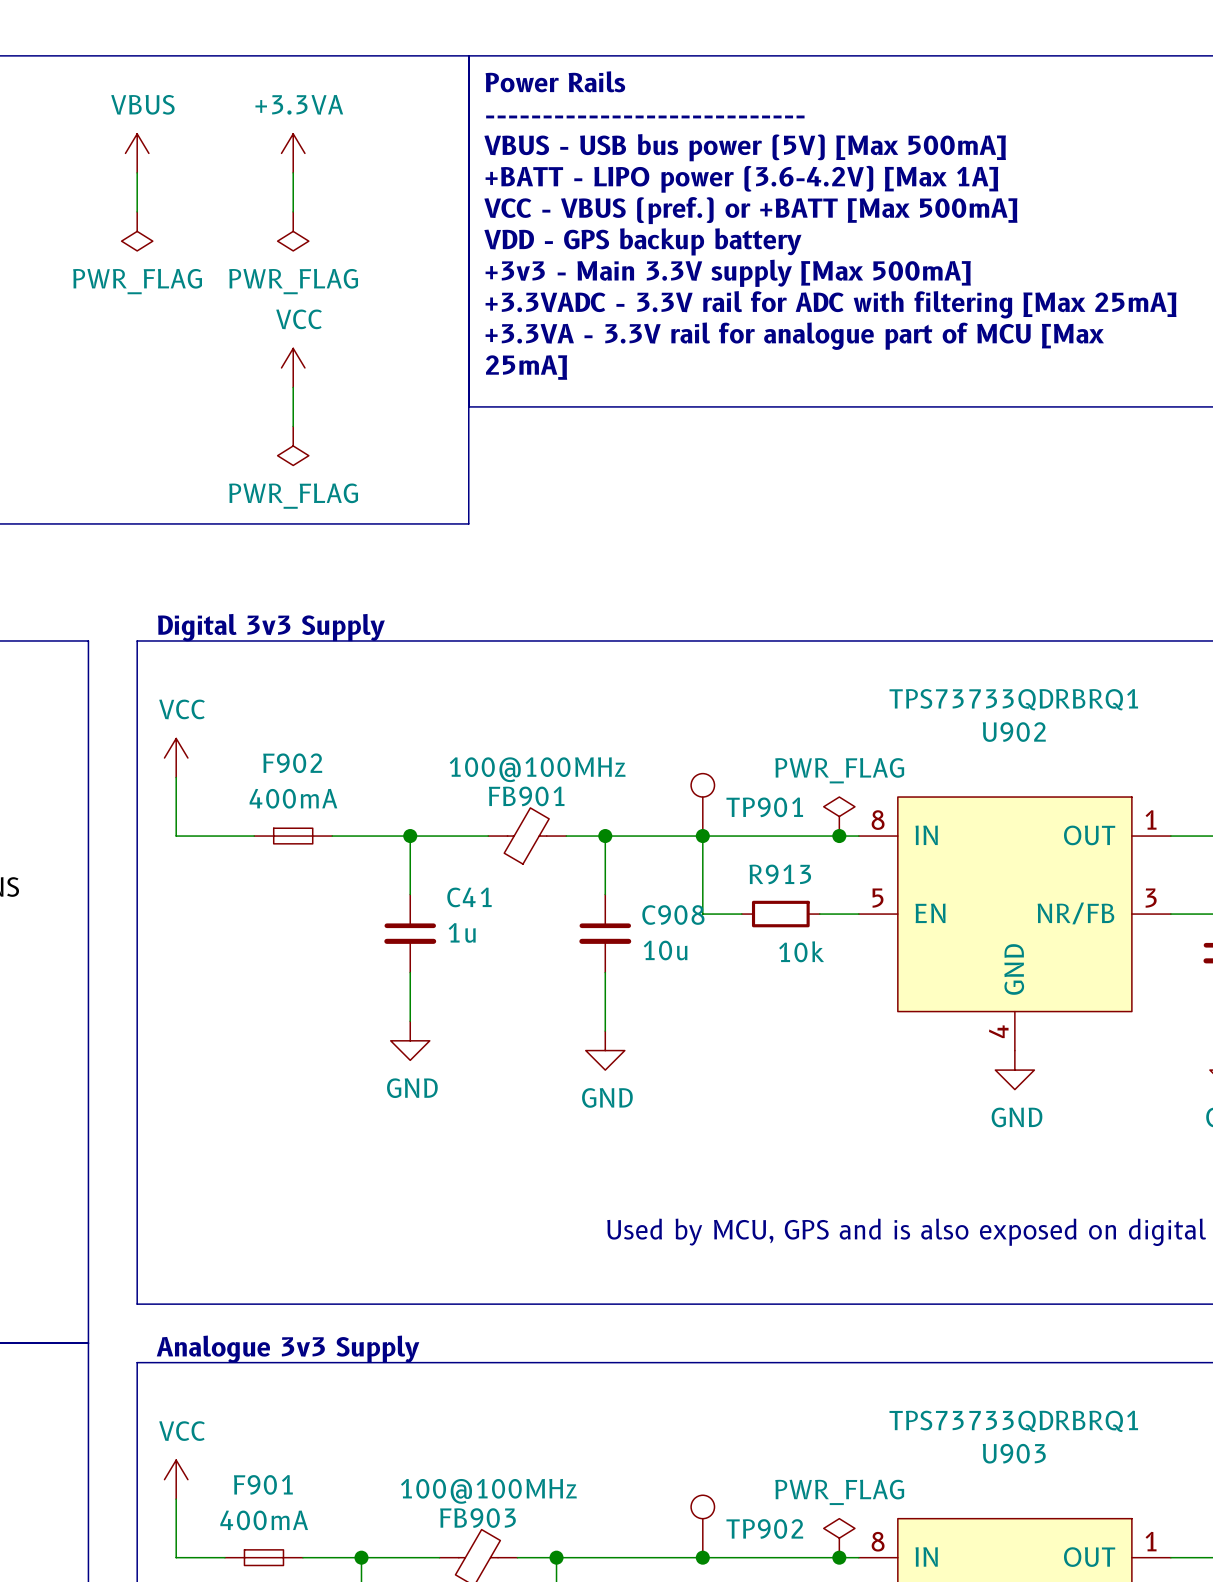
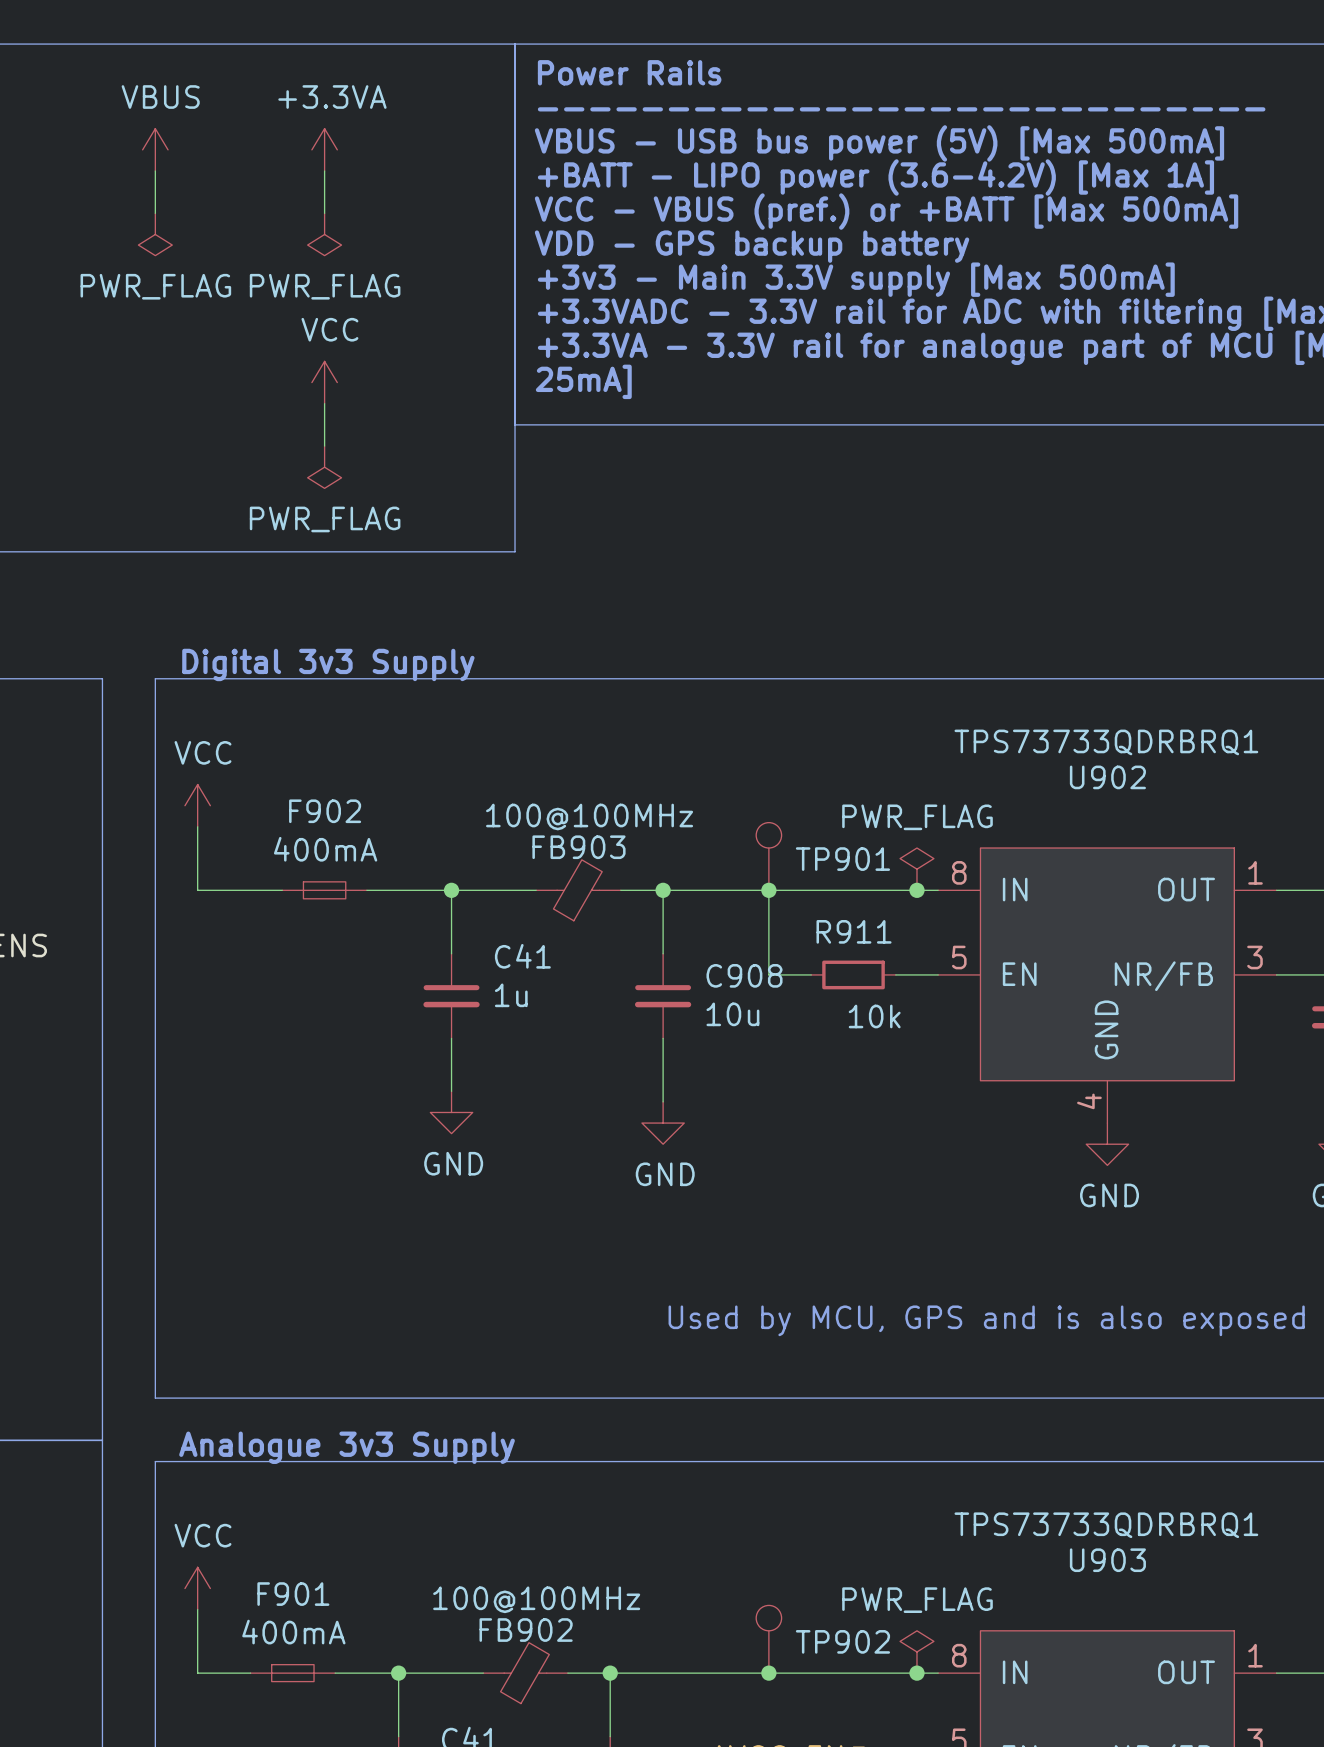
FB901 name: FB901 (526, 796) -> FB903 (578, 847)
R913 name: R913 (780, 874) -> R911 (854, 931)
FB903 name: FB903 (477, 1518) -> FB902 (526, 1630)

